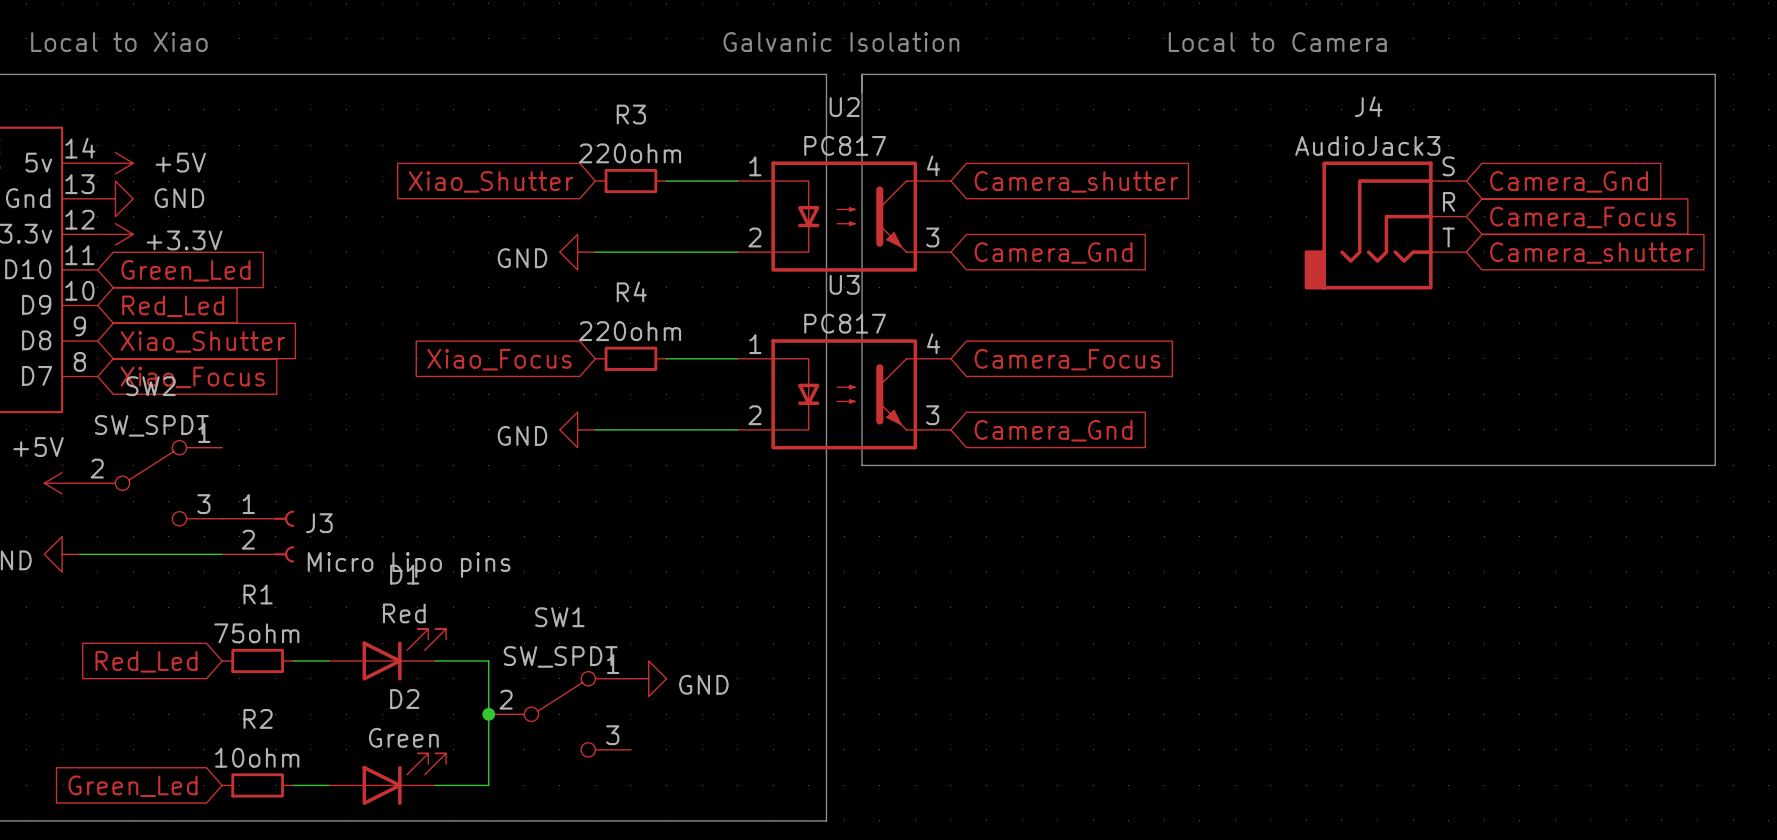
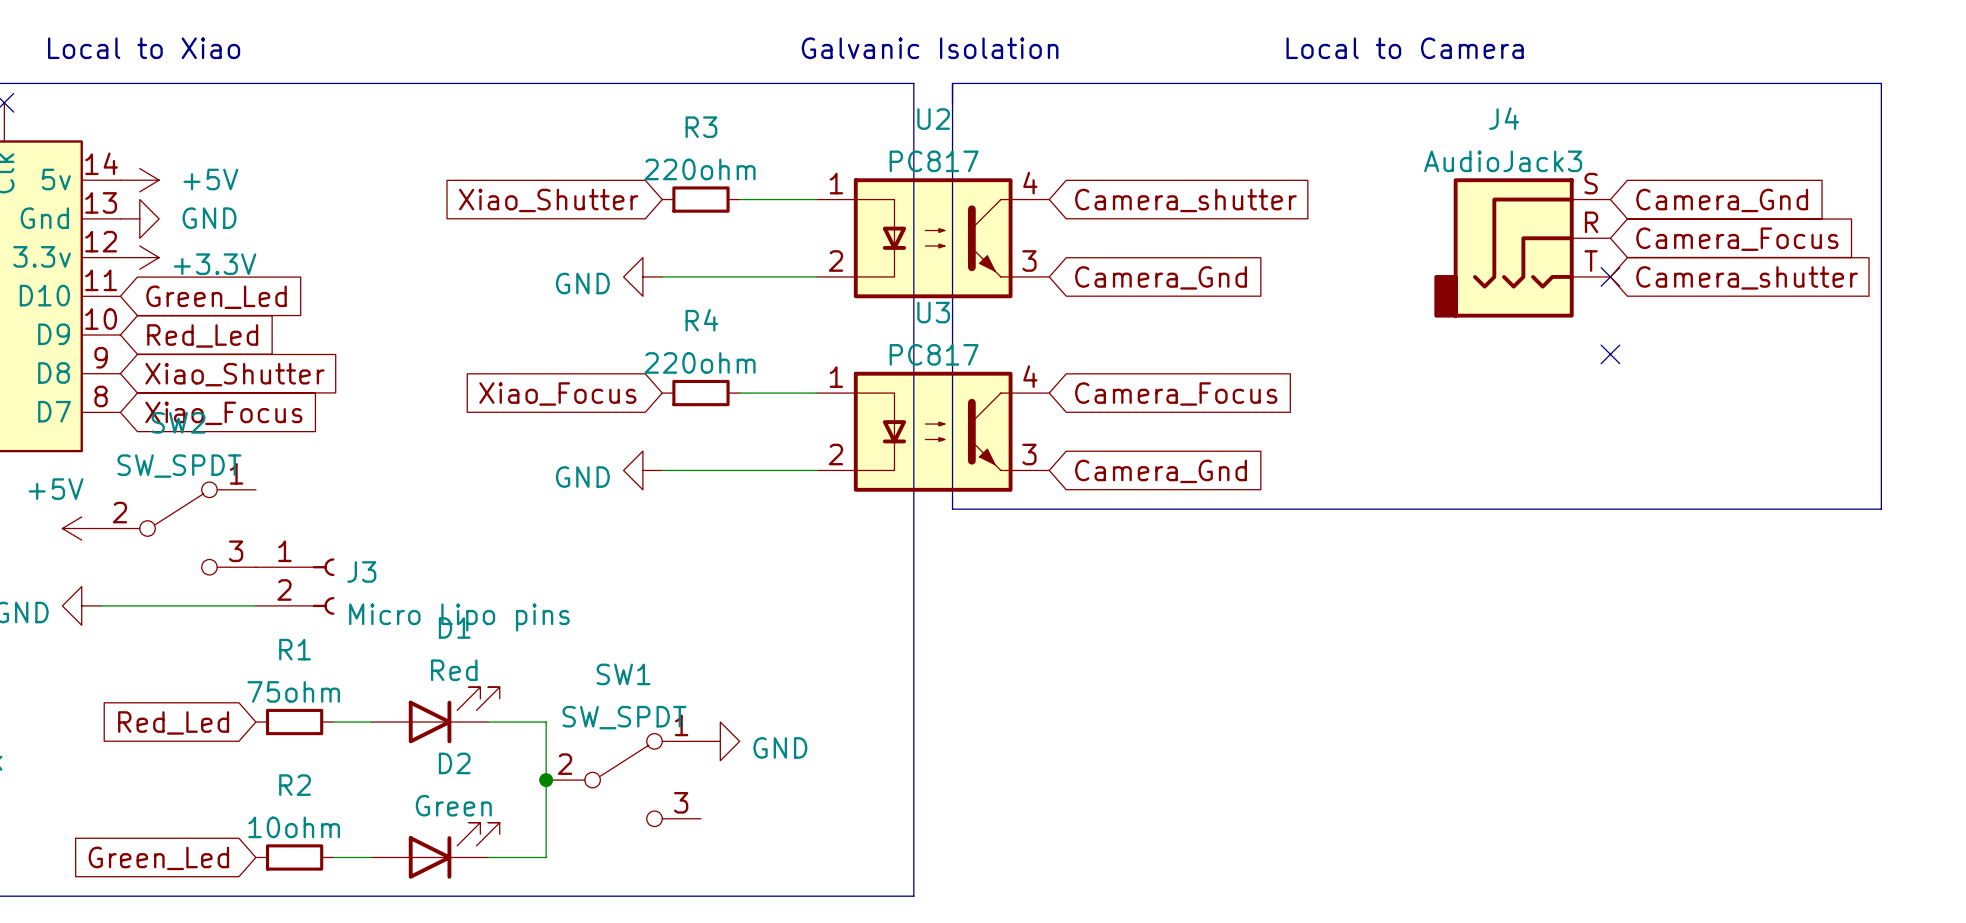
no-connect mark: none -> (1610, 276)
no-connect mark: none -> (1610, 354)

